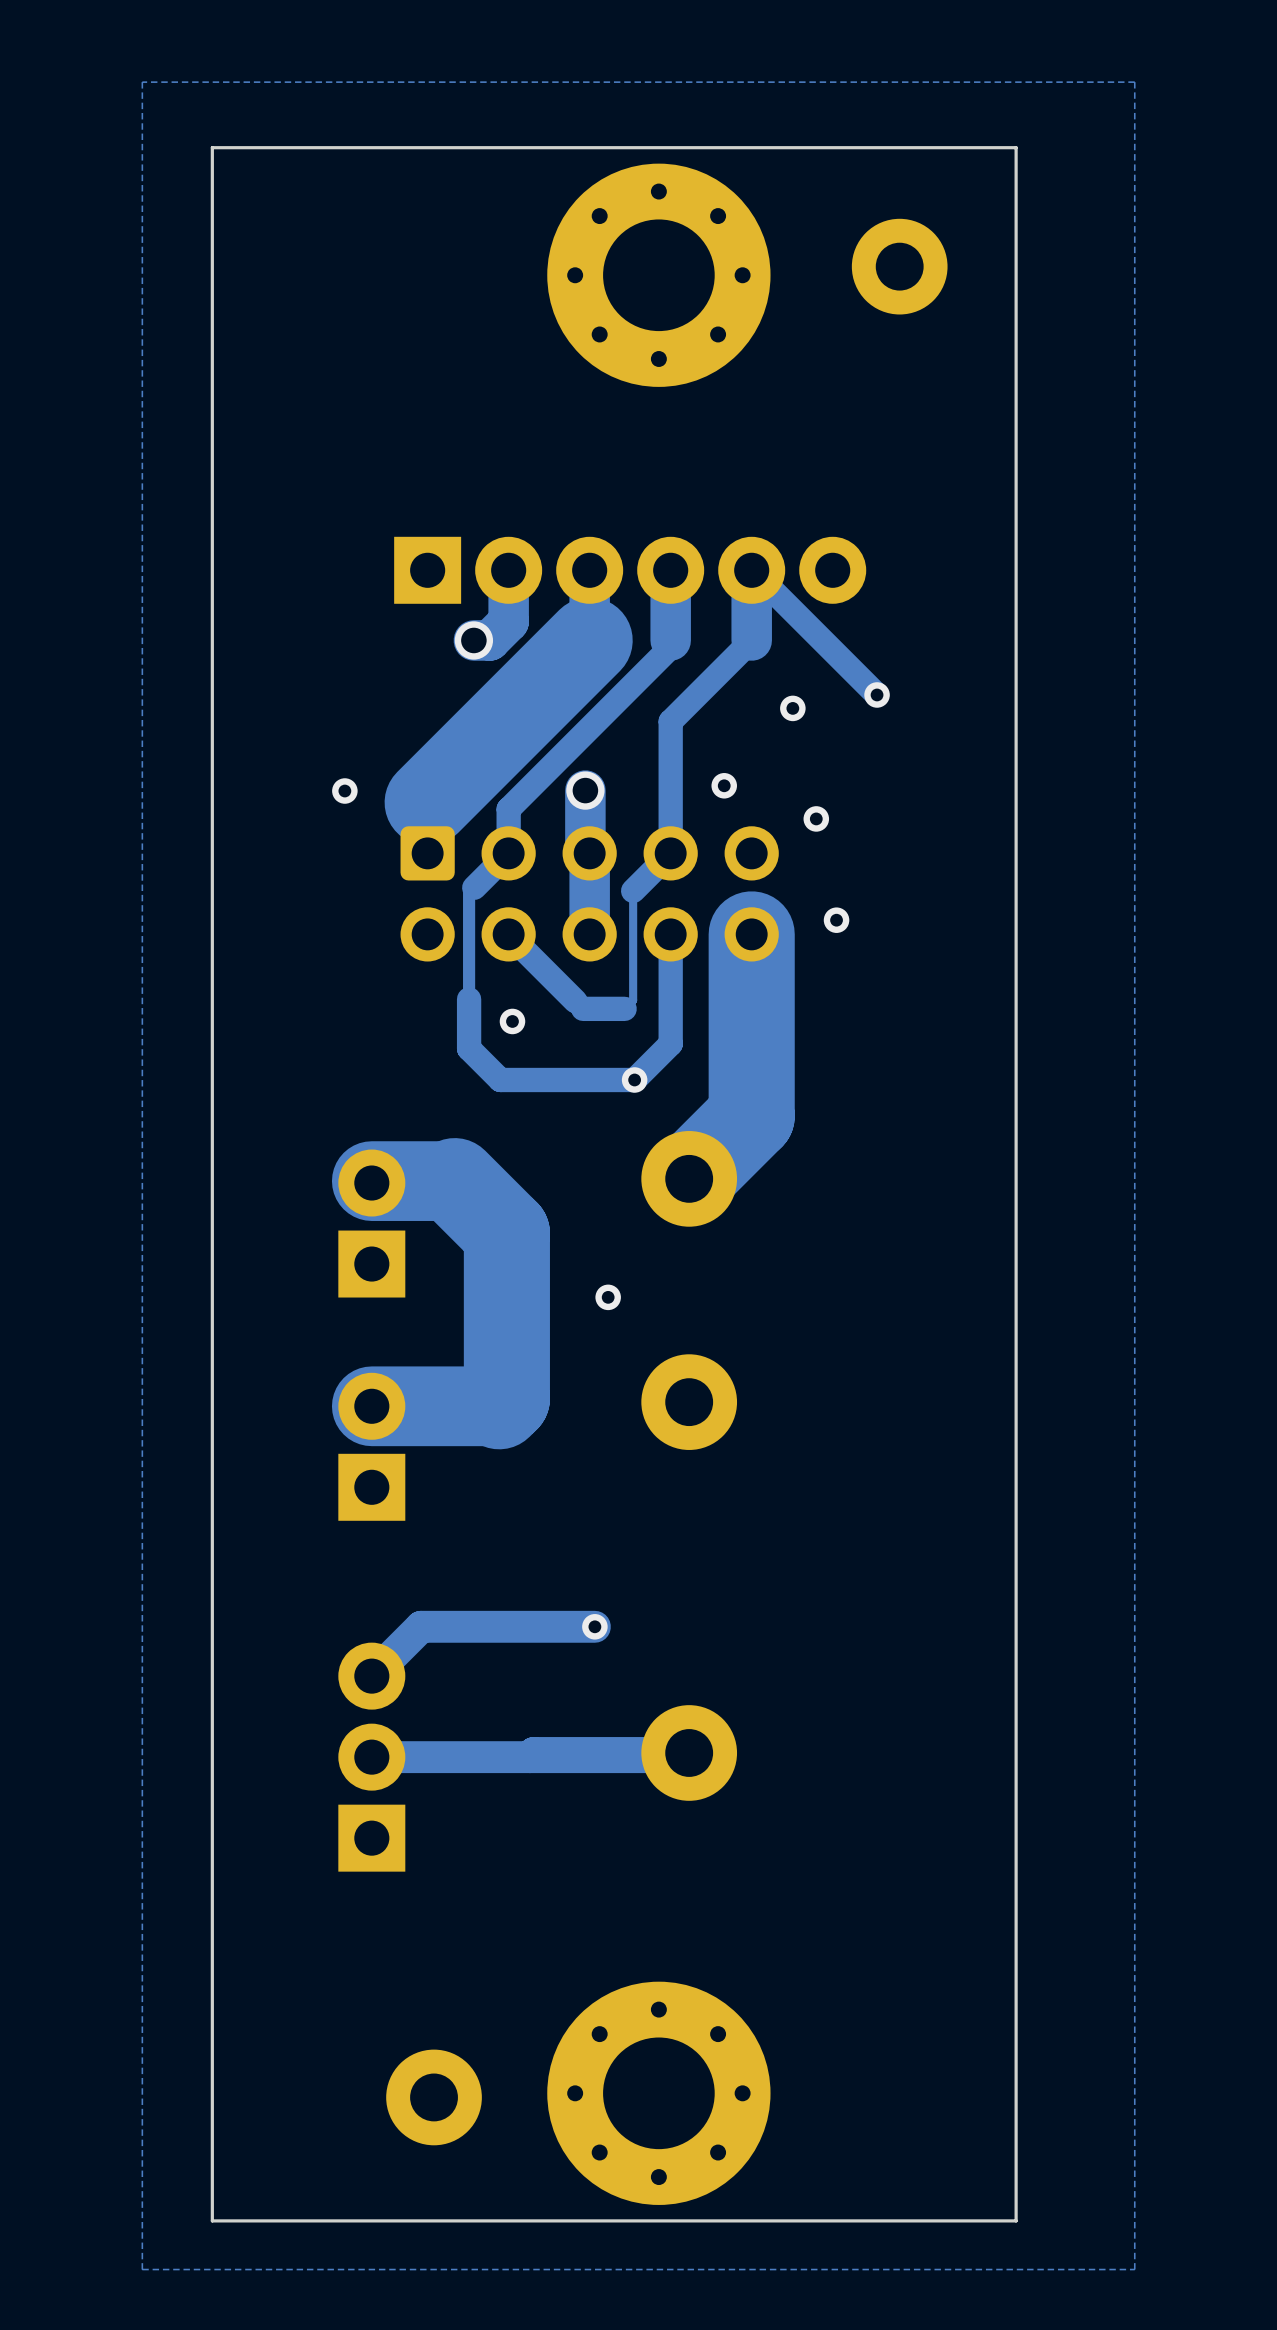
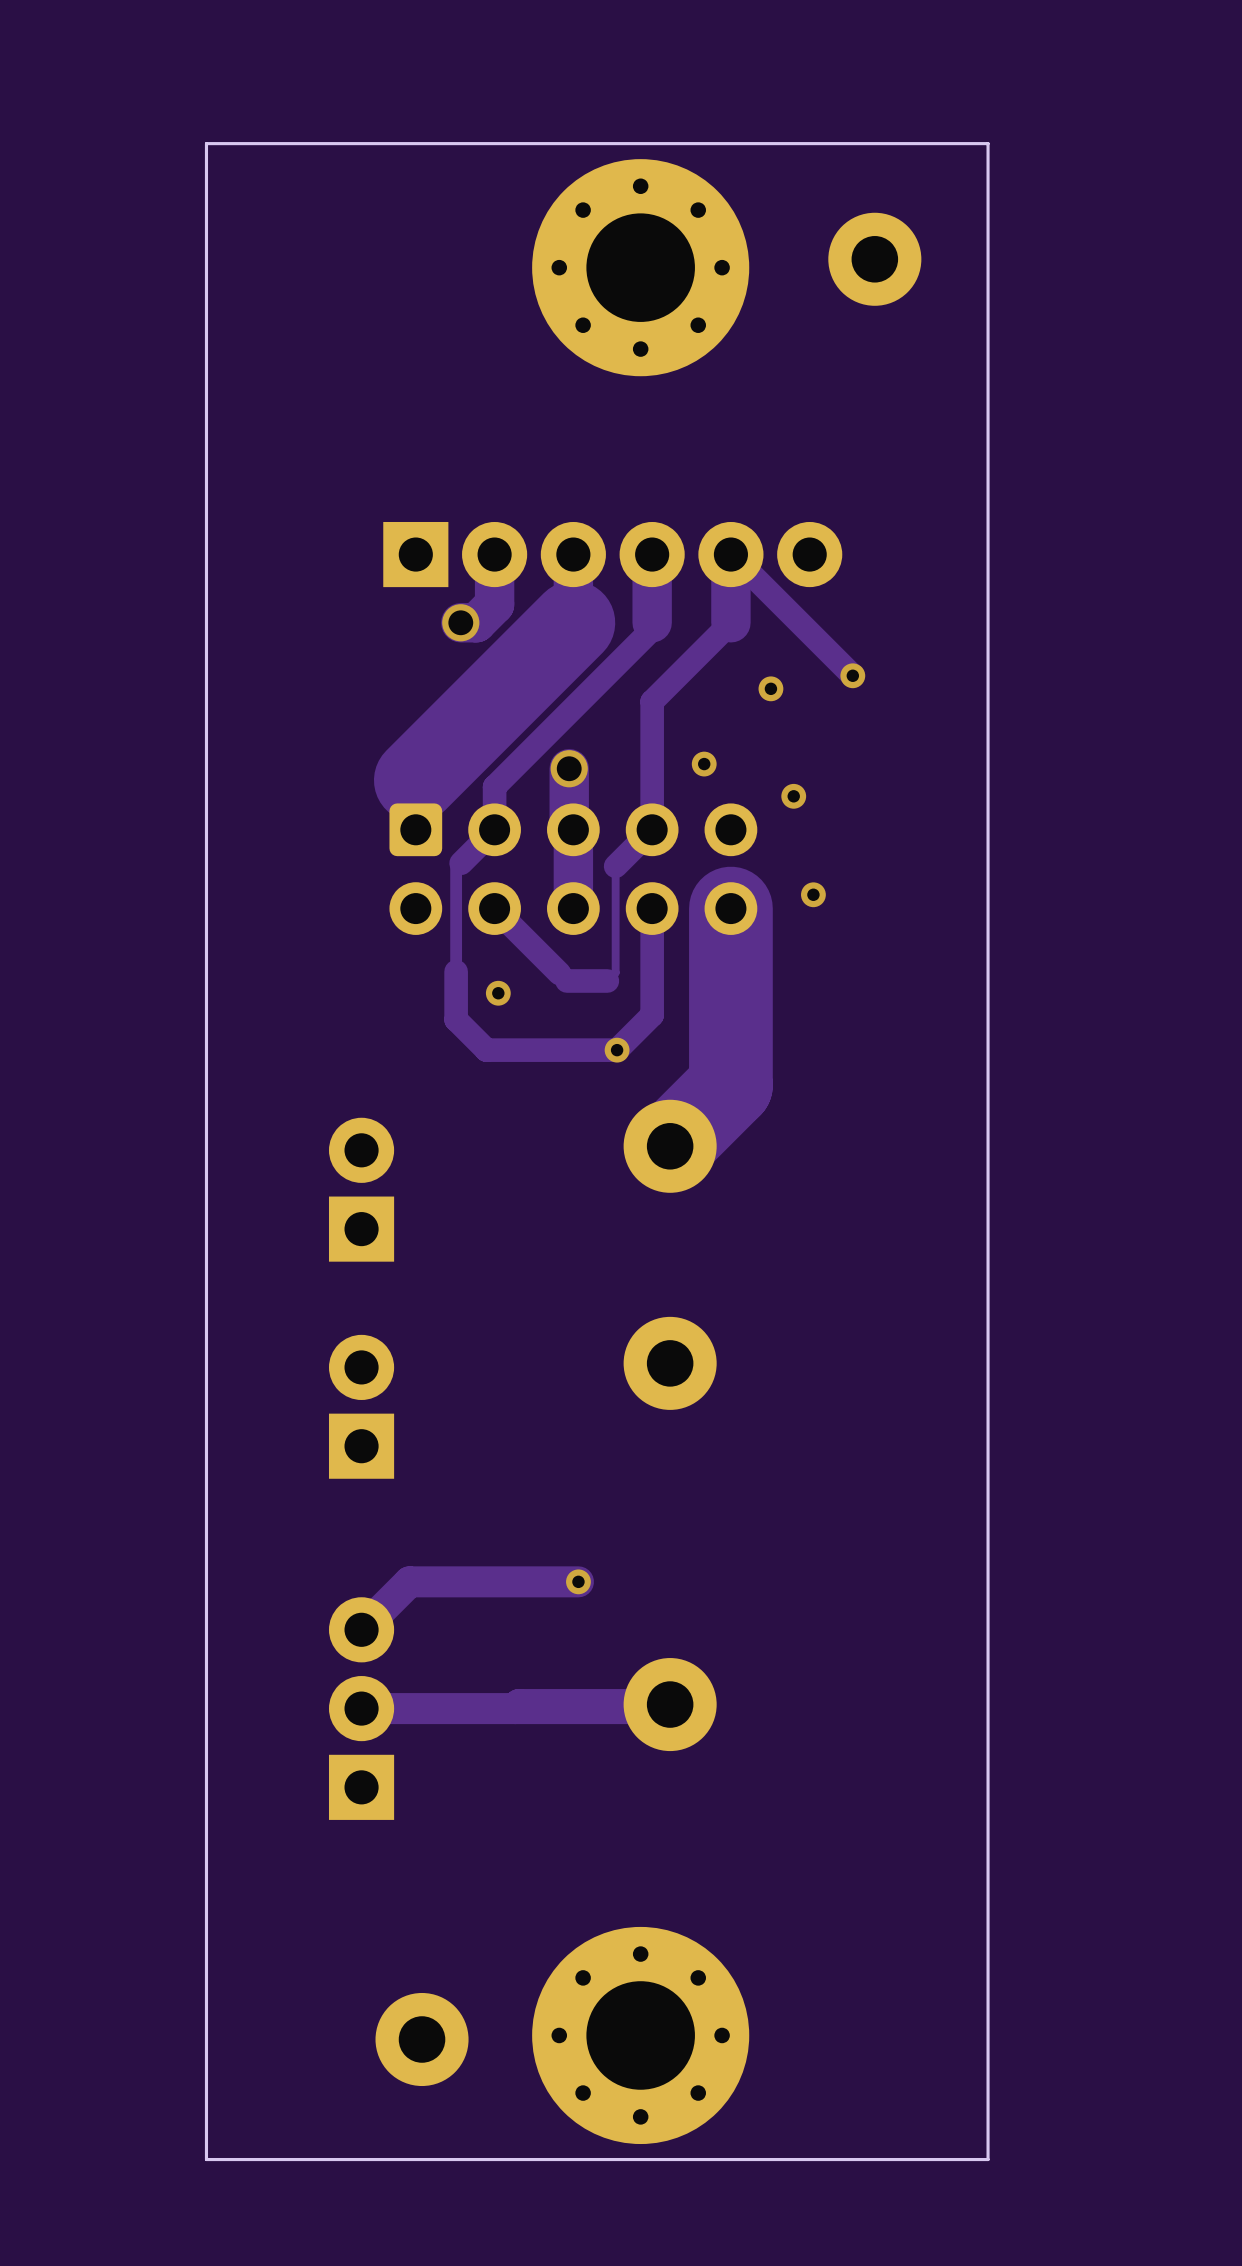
zone outline: (1134, 82) (1134, 2269) (142, 2269) (142, 82) (1134, 82) -> none
via: (344, 791) -> none
track: (371, 1181) (454, 1181) (506, 1233) (506, 1398) (499, 1406) (371, 1406) -> none
via: (608, 1297) -> none

